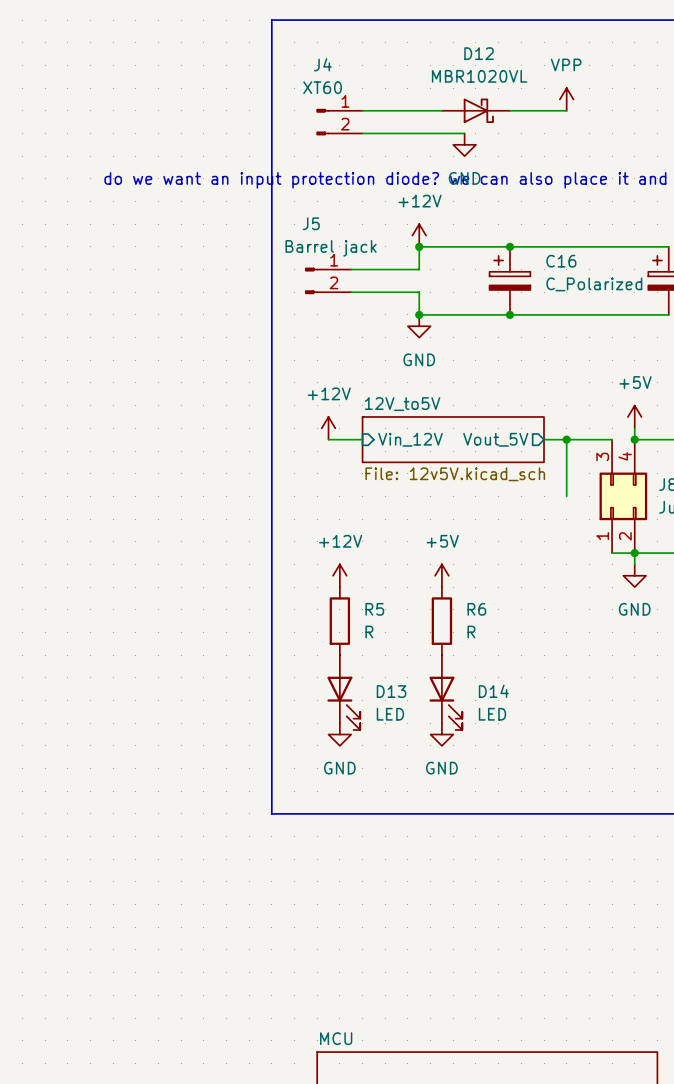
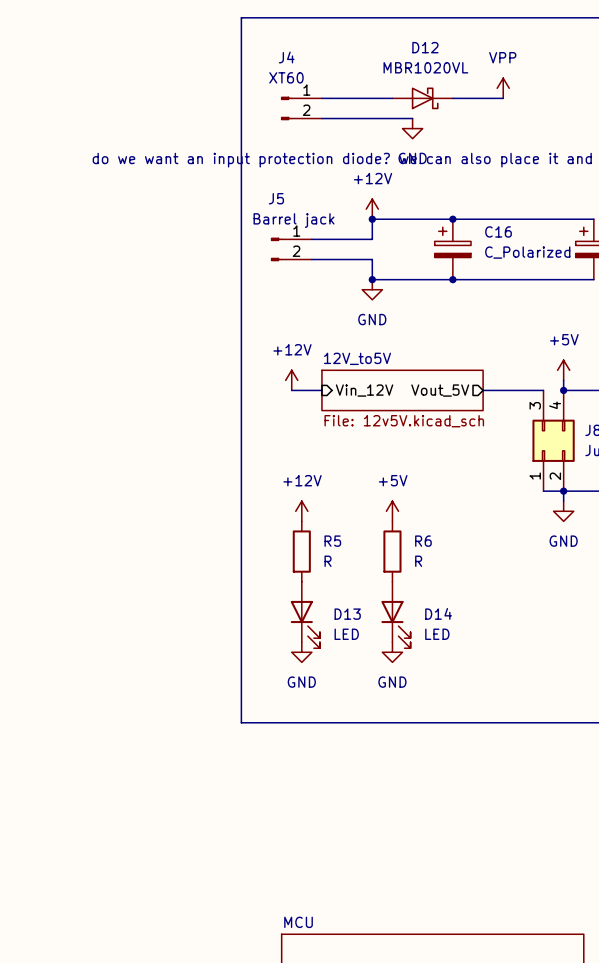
wire: (566, 439) (566, 496) -> none
junction: (566, 439) -> none

